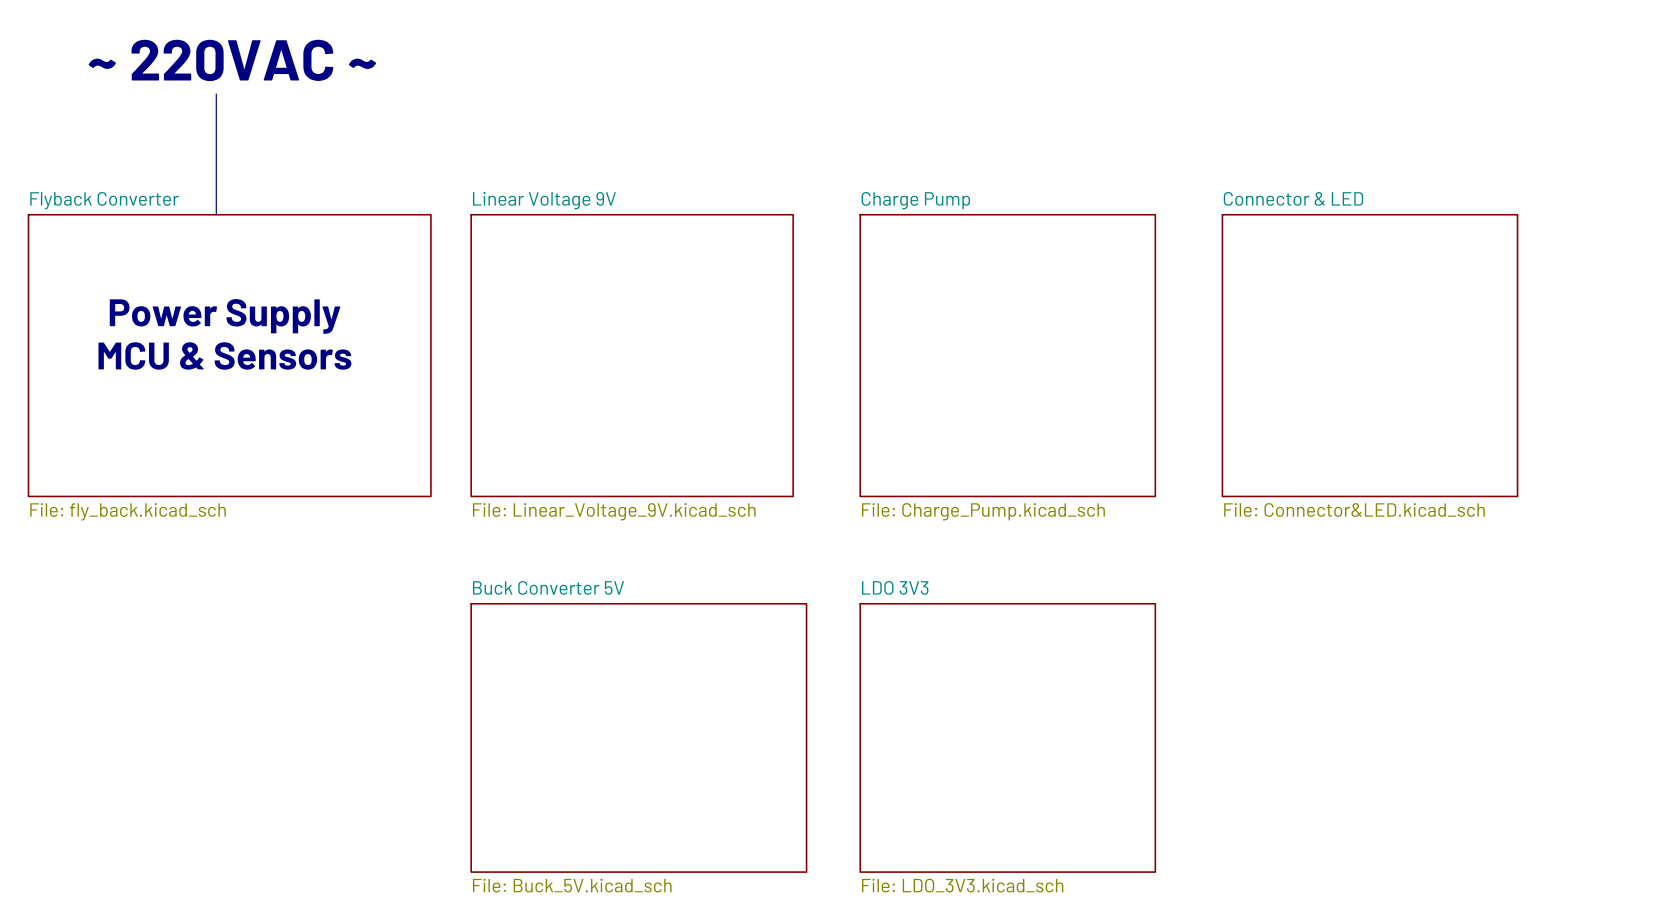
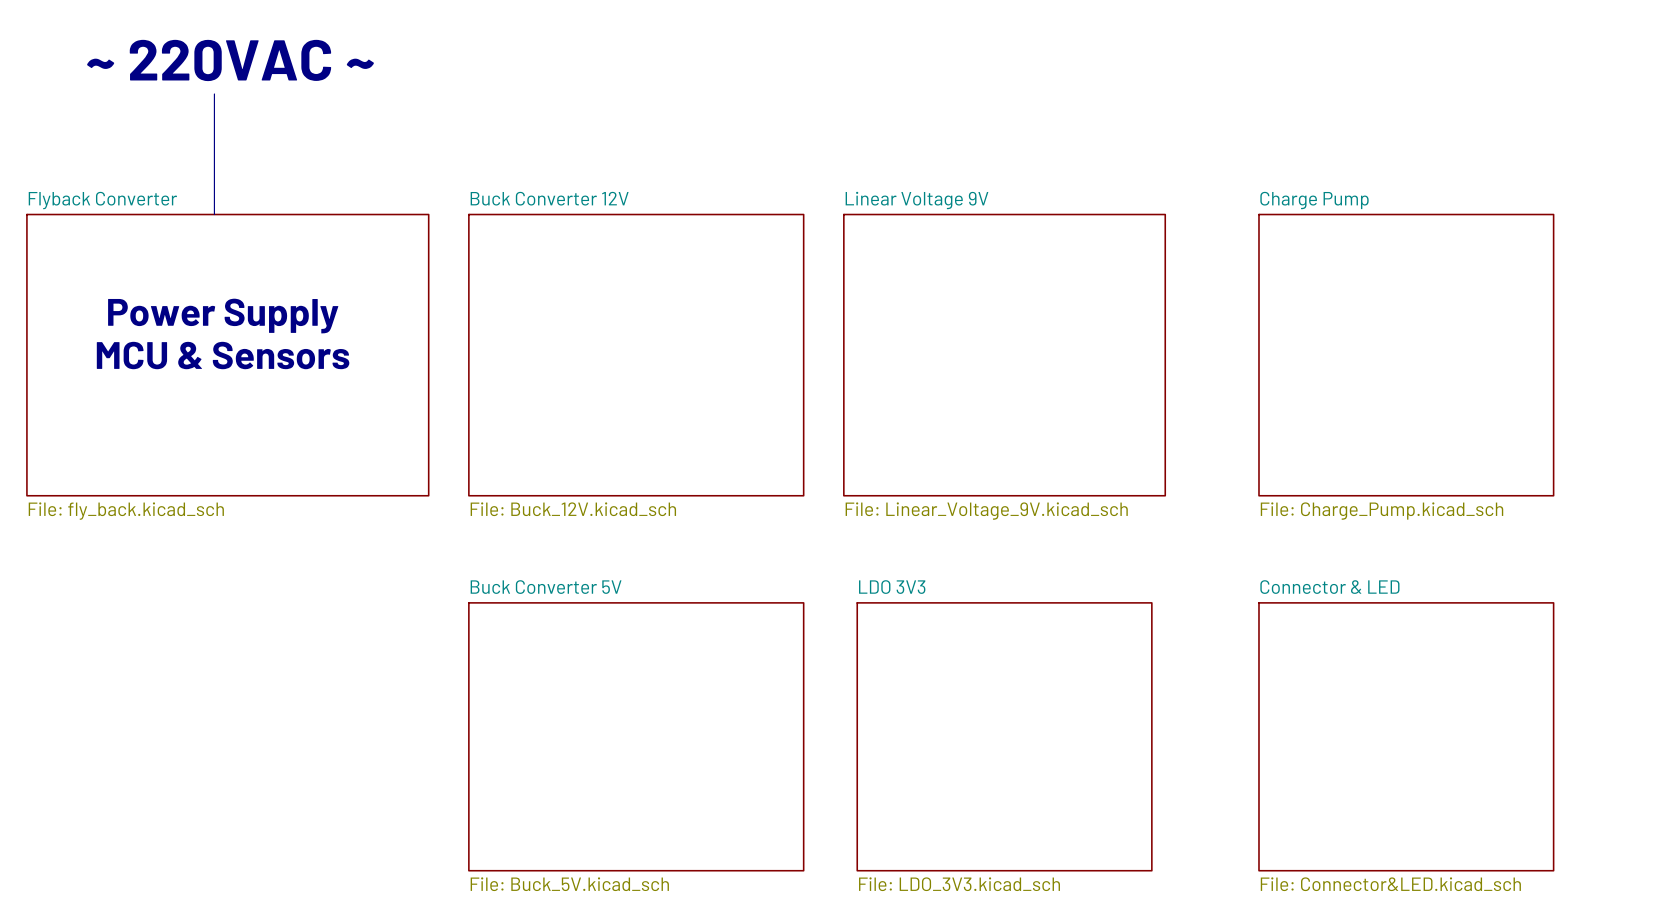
sheet Linear Voltage 9V position: (632, 355) -> (1004, 355)
sheet Buck Converter 12V: none -> File: Buck_12V.kicad_sch (636, 355)
sheet Charge Pump: File: Charge_Pump.kicad_sch (1007, 355) -> none
sheet Connector & LED: File: Connector&LED.kicad_sch (1369, 355) -> none
sheet Charge Pump: none -> File: Charge_Pump.kicad_sch (1406, 355)
sheet Connector & LED: none -> File: Connector&LED.kicad_sch (1406, 736)

